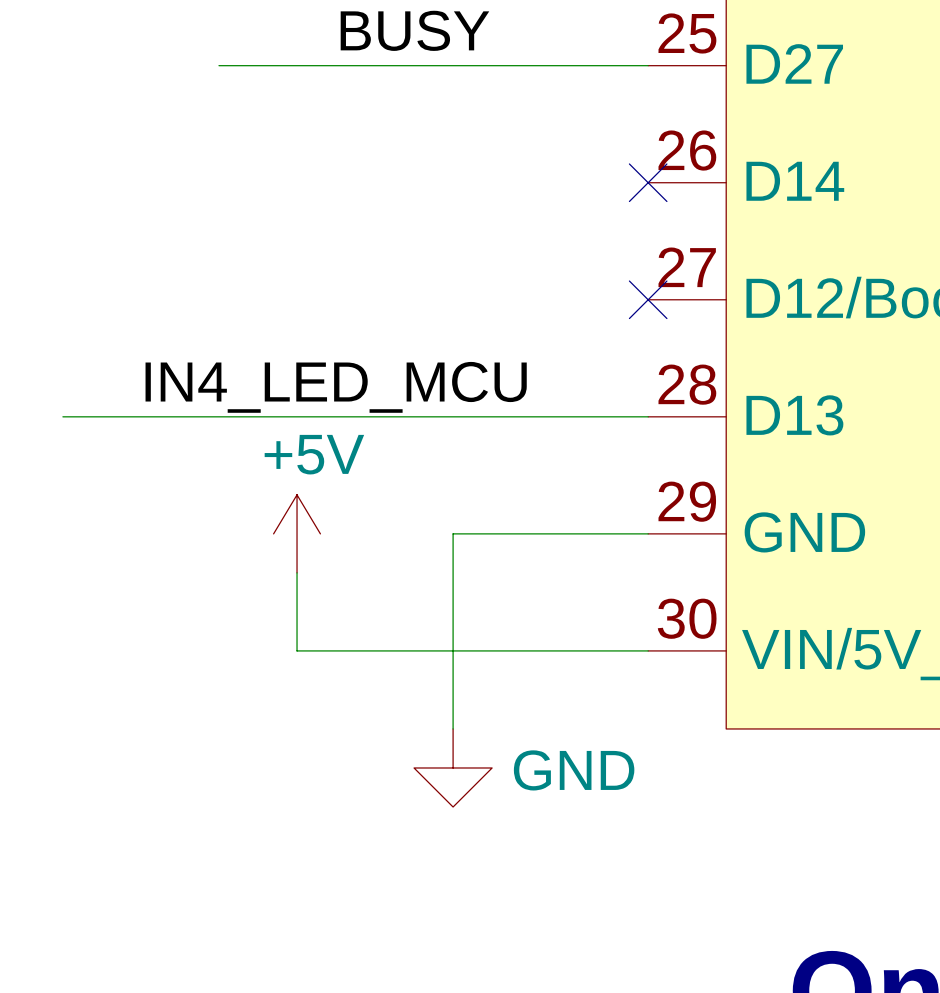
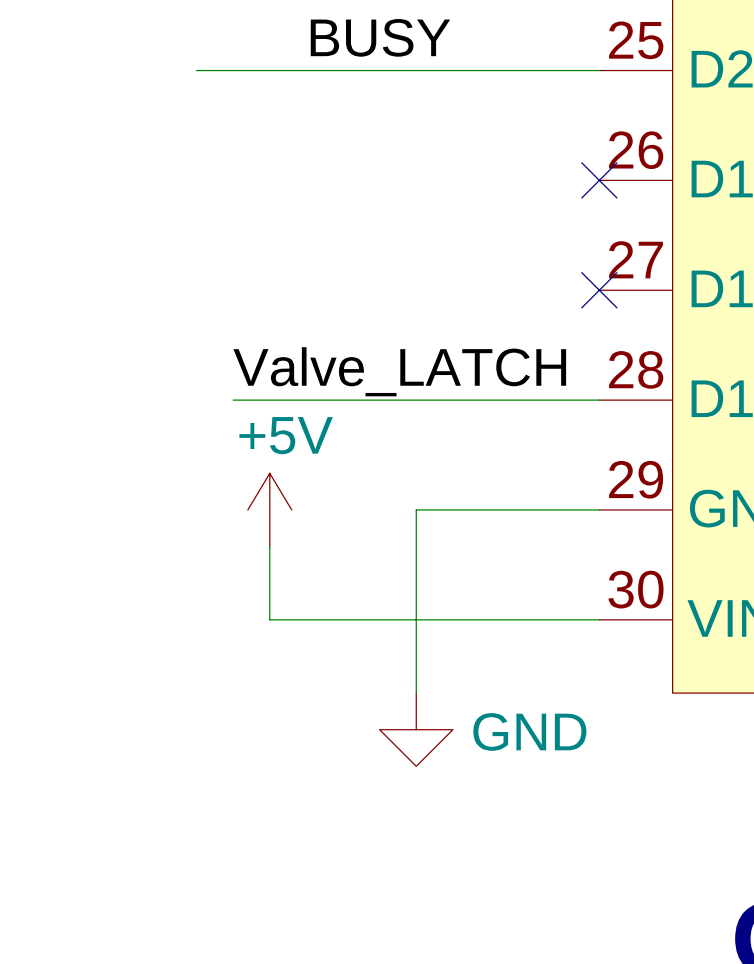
label: none -> Valve_LATCH (399, 371)
label: IN4_LED_MCU (336, 387) -> none
wire: (62, 416) (258, 416) -> none

